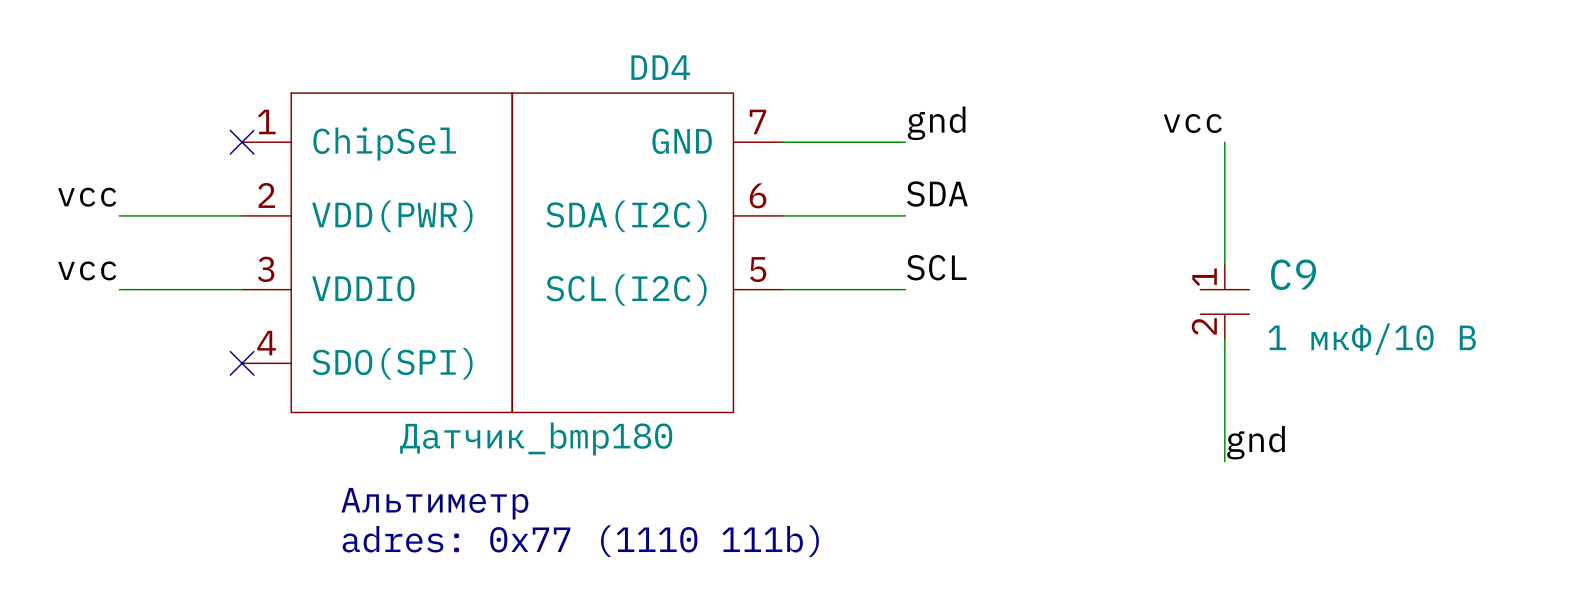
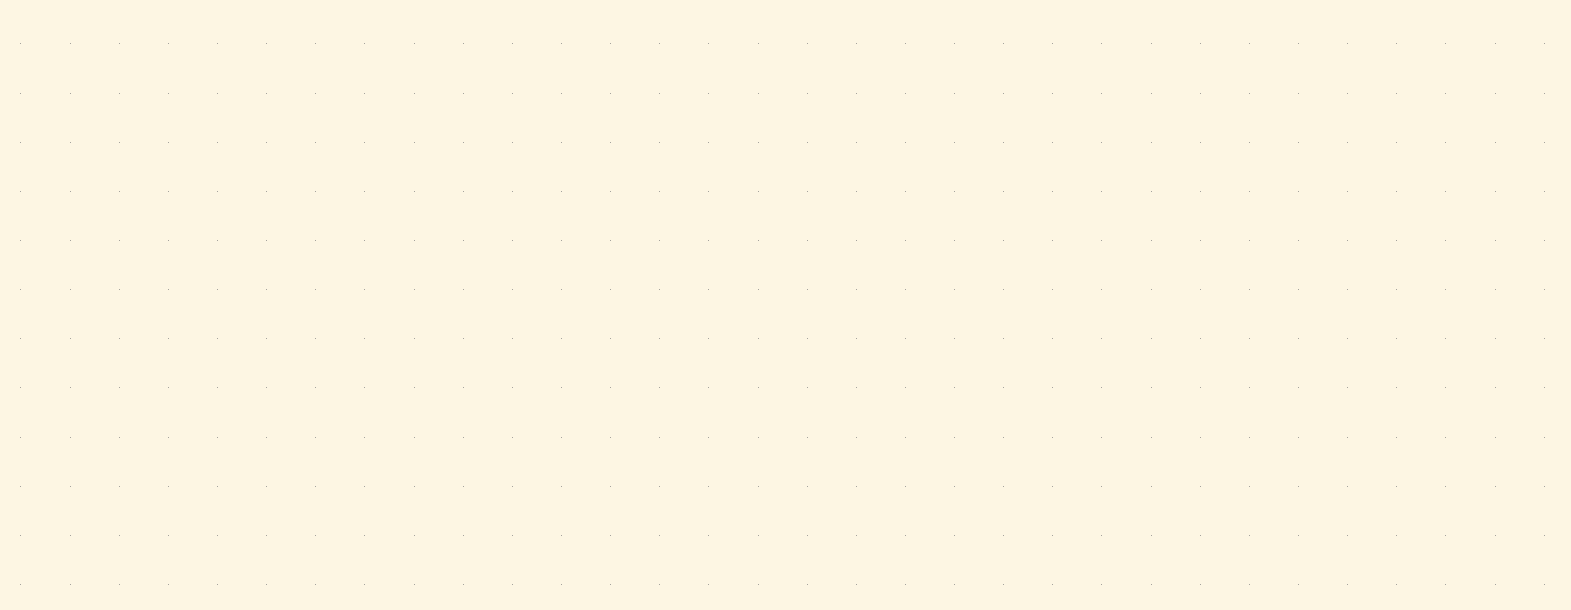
label: gnd (936, 123) -> none
label: vcc (1192, 123) -> none
no-connect mark: (242, 142) -> none
wire: (782, 142) (905, 142) -> none
wire: (1224, 142) (1224, 265) -> none
label: SDA (937, 194) -> none
label: vcc (87, 197) -> none
wire: (119, 215) (242, 215) -> none
wire: (782, 215) (905, 215) -> none
DD4: Датчик_bmp180 (512, 252) -> none
label: SCL (936, 267) -> none
label: vcc (87, 270) -> none
wire: (119, 289) (242, 289) -> none
wire: (782, 289) (905, 289) -> none
C9: (1224, 301) -> none
wire: (1224, 338) (1224, 461) -> none
no-connect mark: (242, 363) -> none
label: gnd (1256, 442) -> none
text: Альтиметр (434, 503) -> none
text: adres: 0x77 (1110 111b) (580, 541) -> none

